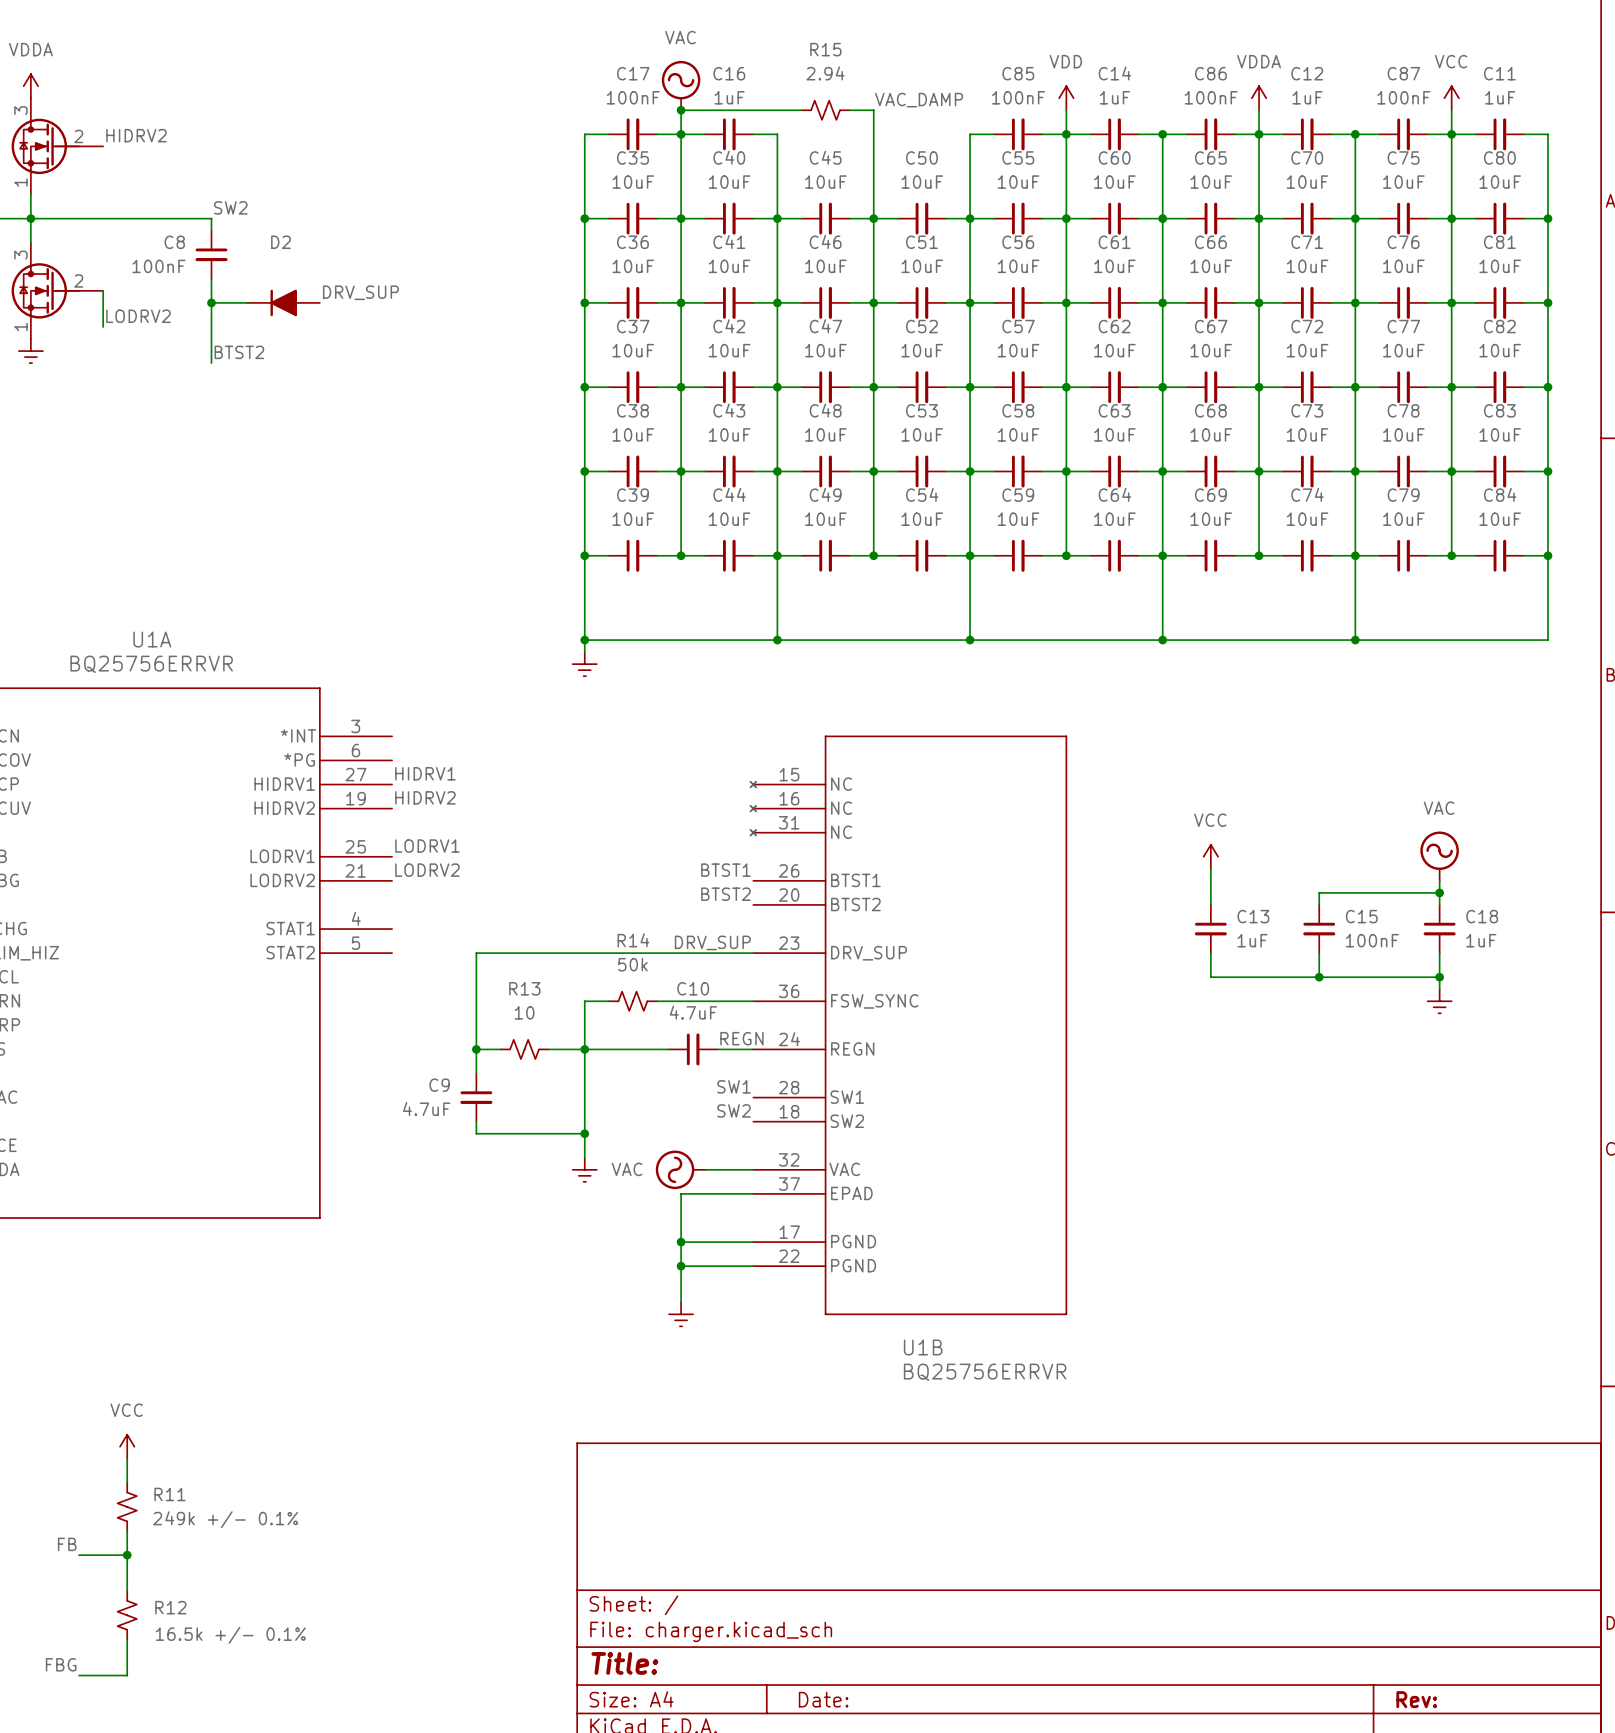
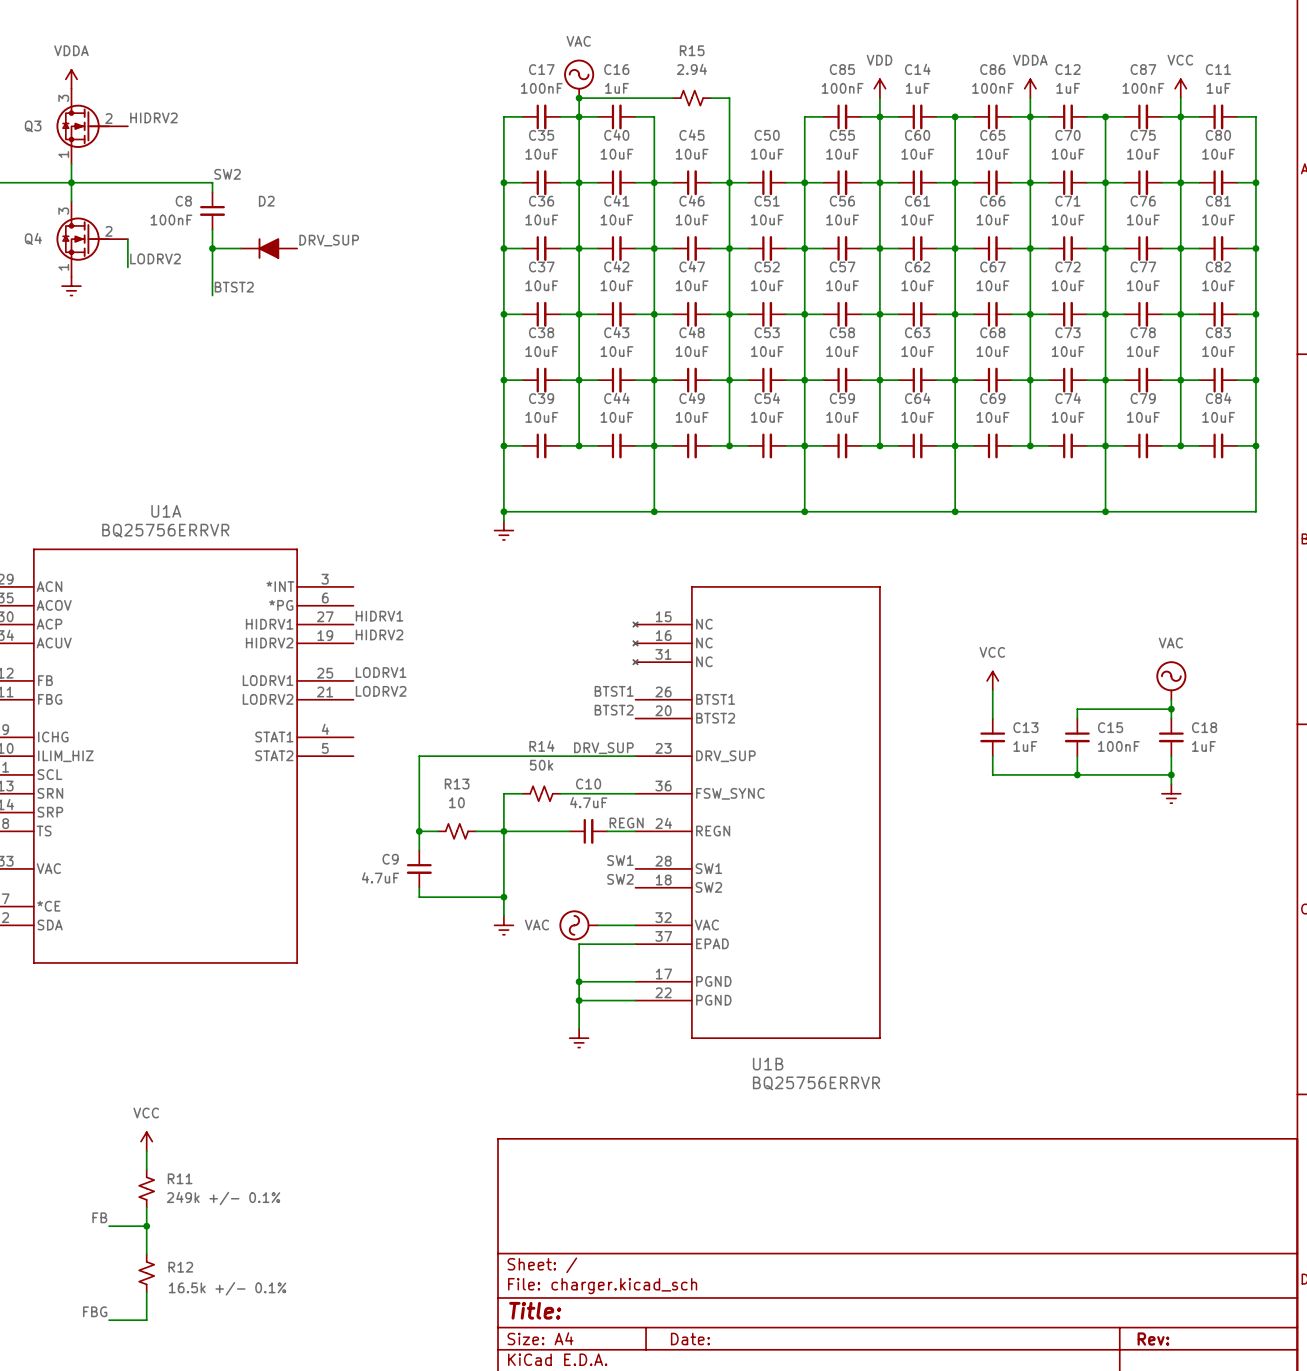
label: VAC_DAMP (919, 100) -> none

